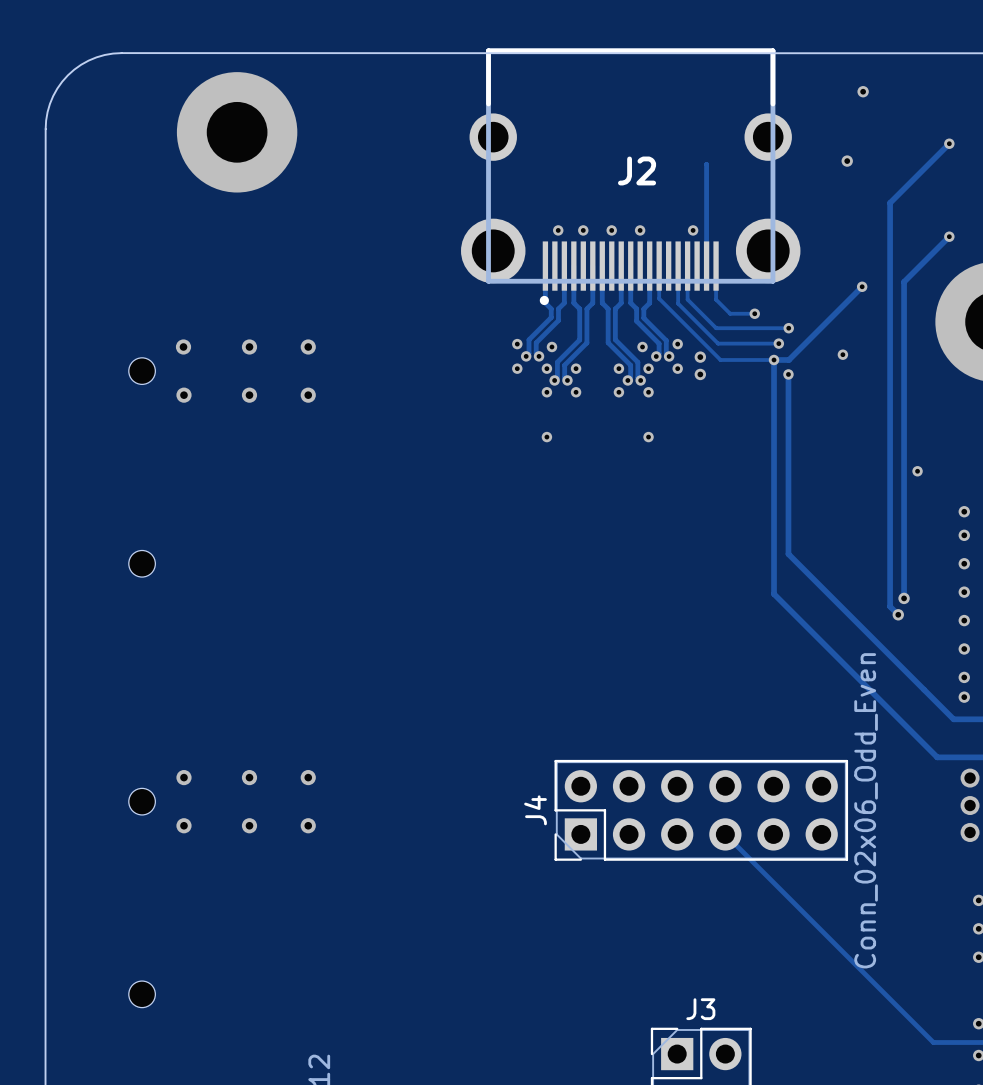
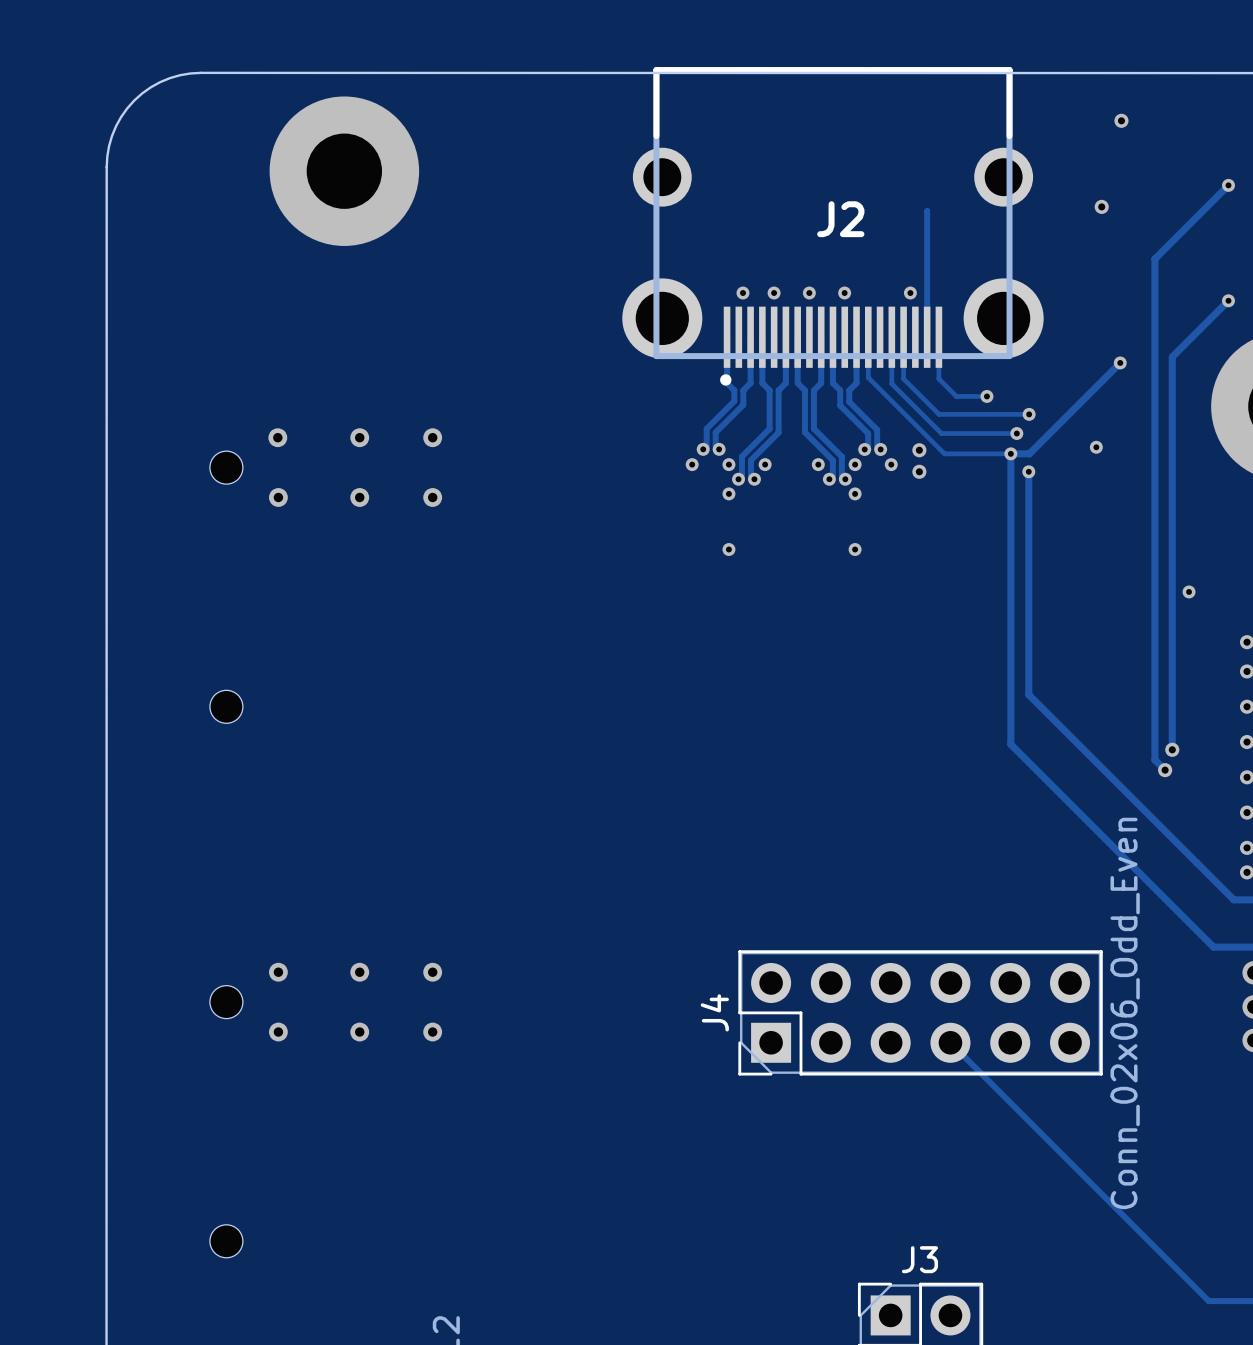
via: (517, 344) -> none
via: (677, 344) -> none
via: (551, 346) -> none
via: (642, 346) -> none
via: (576, 392) -> none
via: (618, 392) -> none

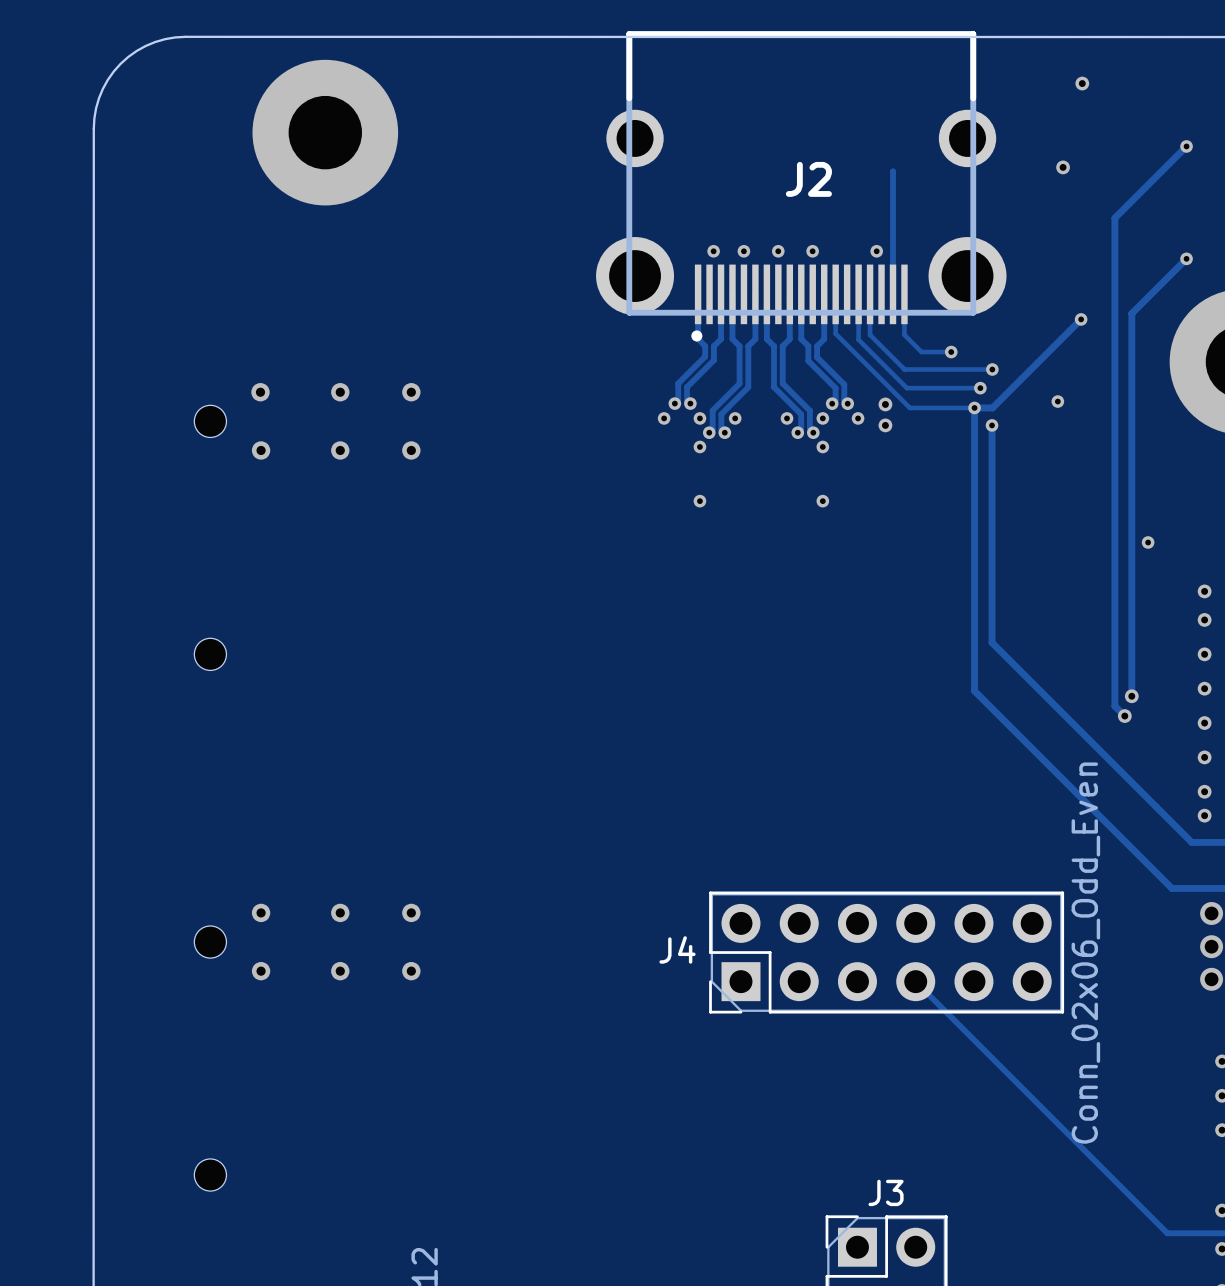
J4 name rotation: 0° (714, 1012) -> 90° clockwise (677, 949)

